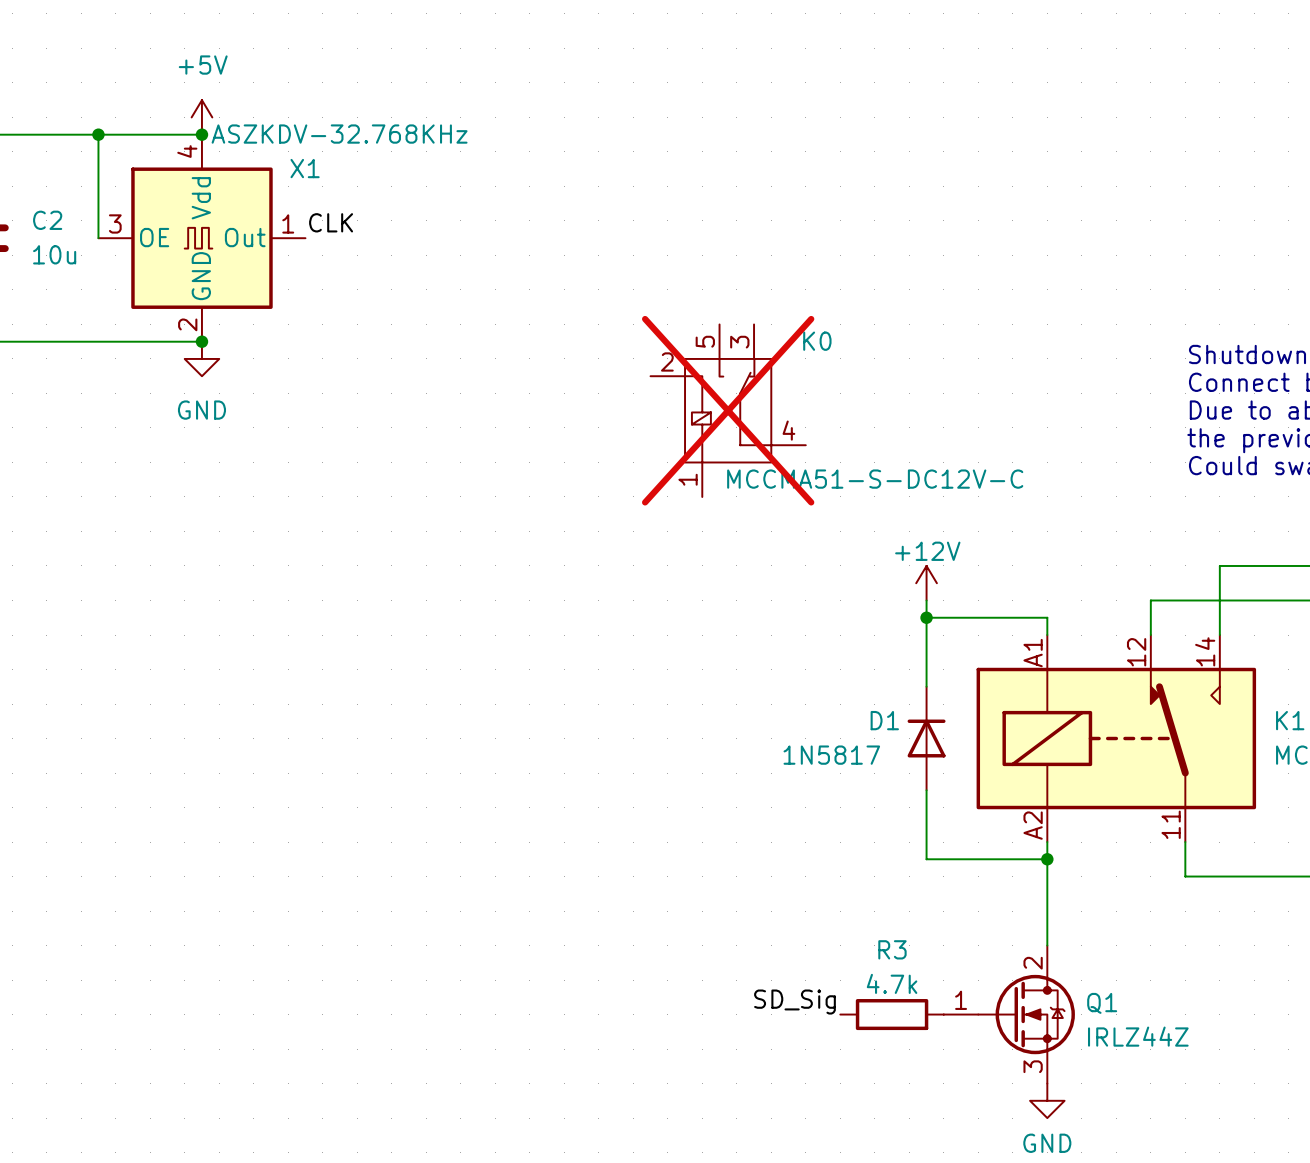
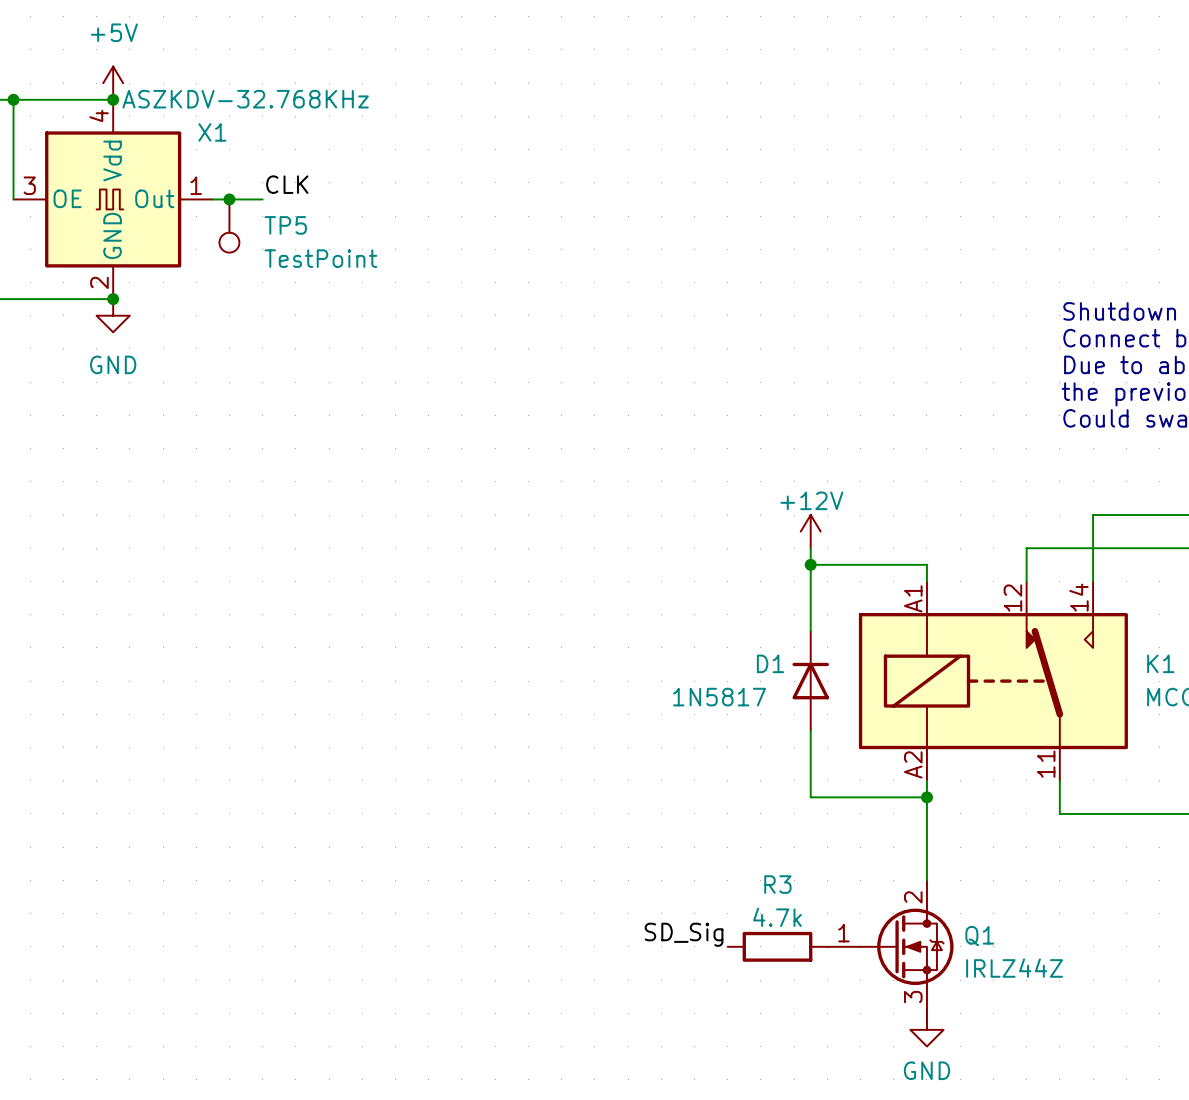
label position: CLK (331, 222) -> CLK (287, 184)
wire: none -> (212, 199) (262, 199)
junction: none -> (229, 199)
TP5: none -> TestPoint (229, 226)
K0: MCCMA51-S-DC12V-C (728, 410) -> none

